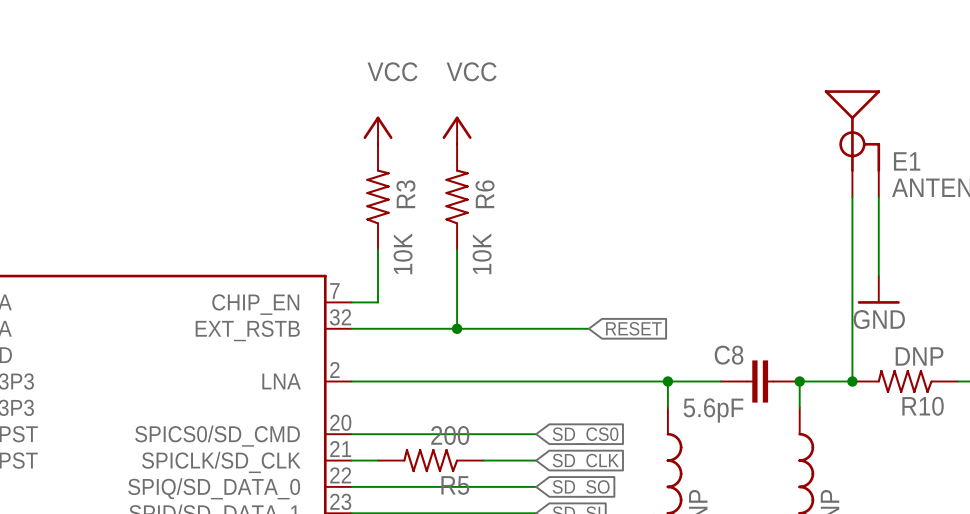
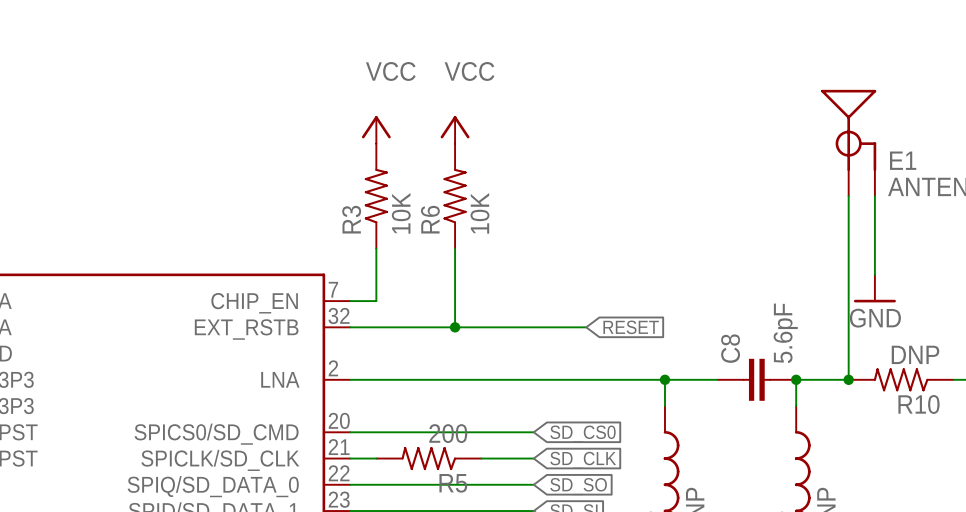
R3 name position: R3 (405, 194) -> R3 (351, 219)
R6 name position: R6 (485, 194) -> R6 (430, 219)
R3 value position: 10K (403, 253) -> 10K (401, 213)
R6 value position: 10K (482, 253) -> 10K (479, 213)
C8 name rotation: 0° (729, 355) -> 90° counterclockwise (730, 348)
C8 value rotation: 0° (713, 410) -> 90° counterclockwise (785, 333)
C8 value position: 5.6pF (713, 410) -> 5.6pF (785, 333)

